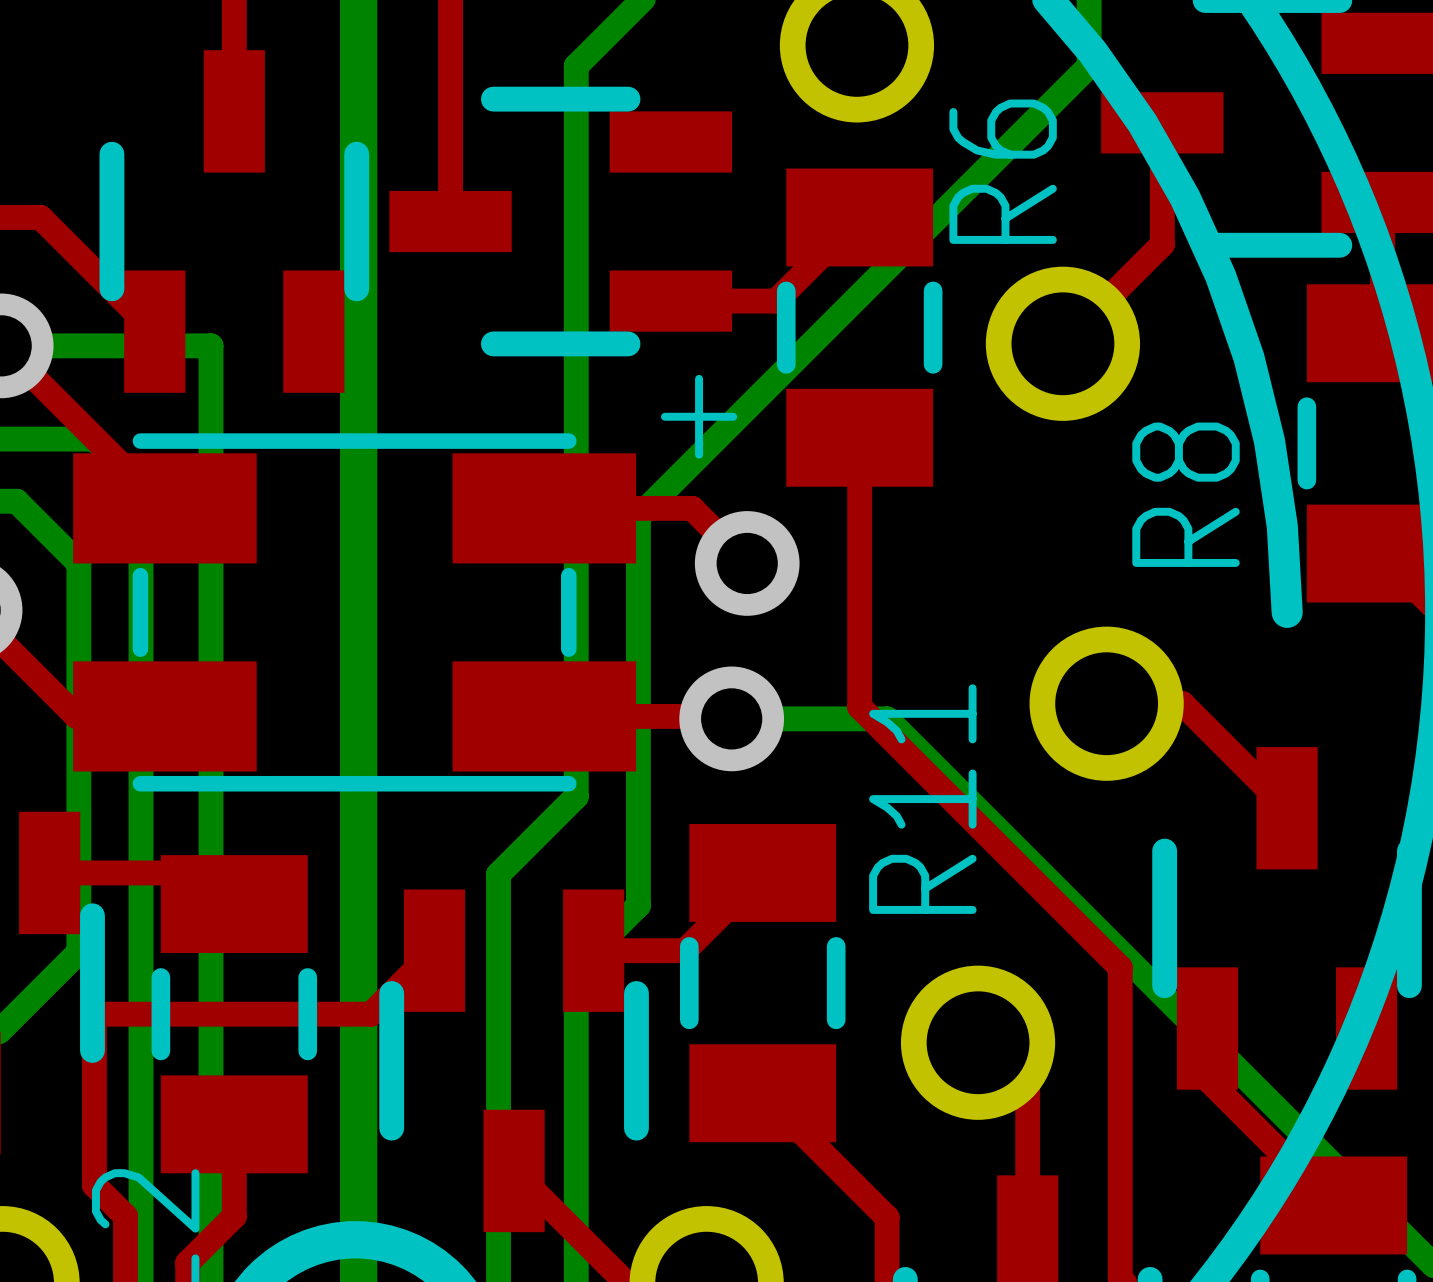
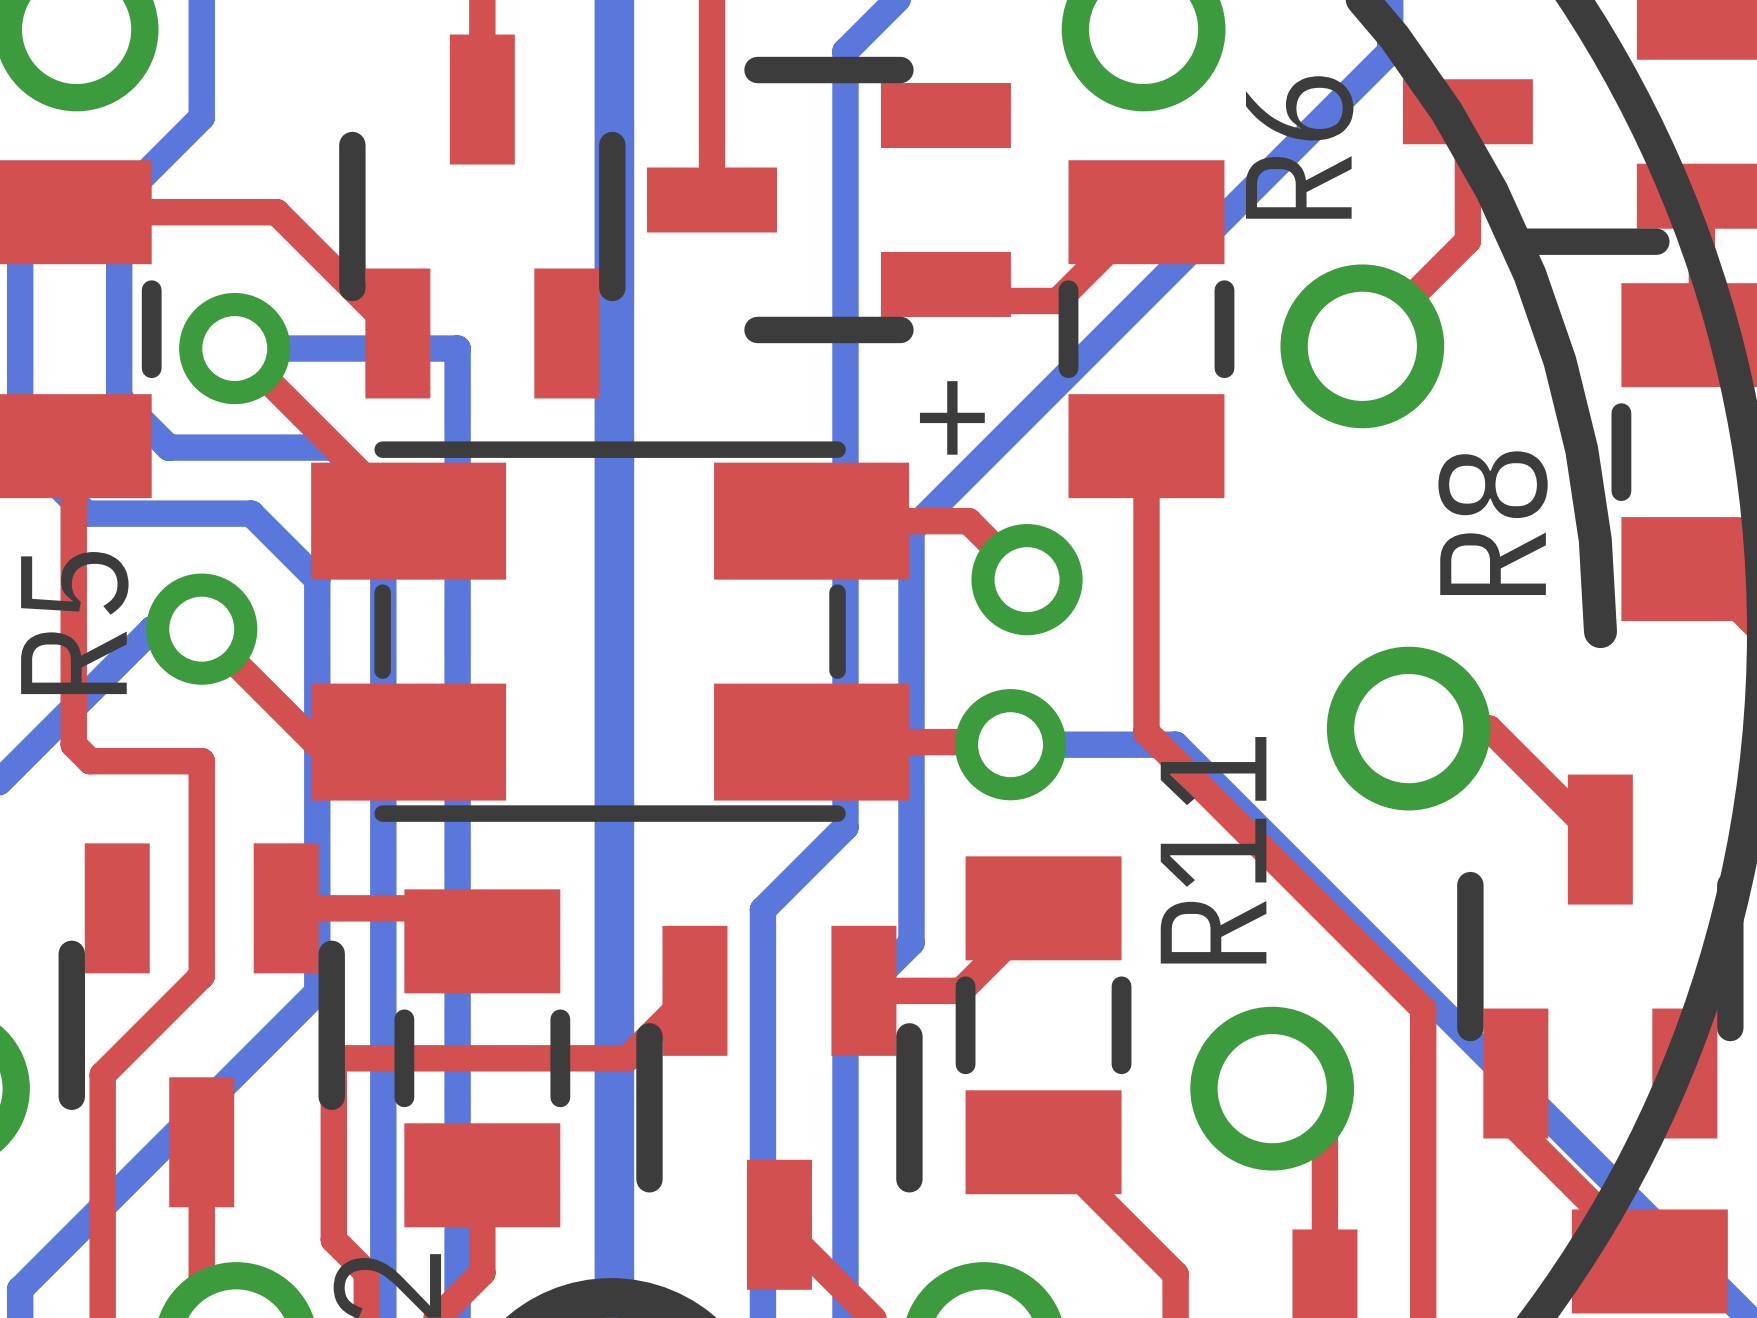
part position: (560, 221) -> (828, 200)

